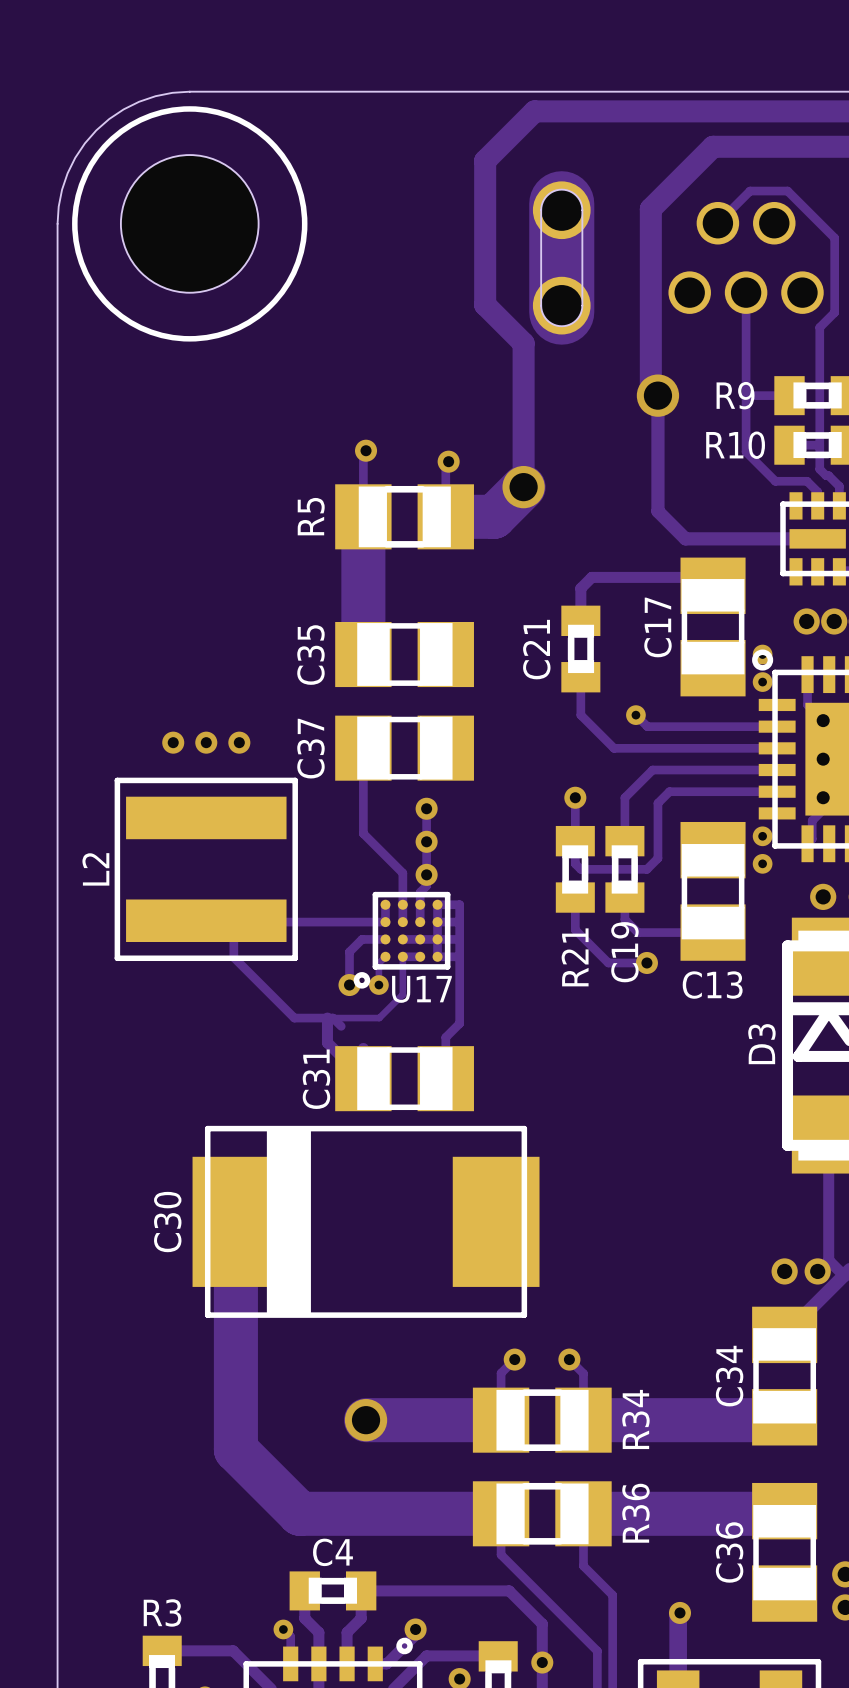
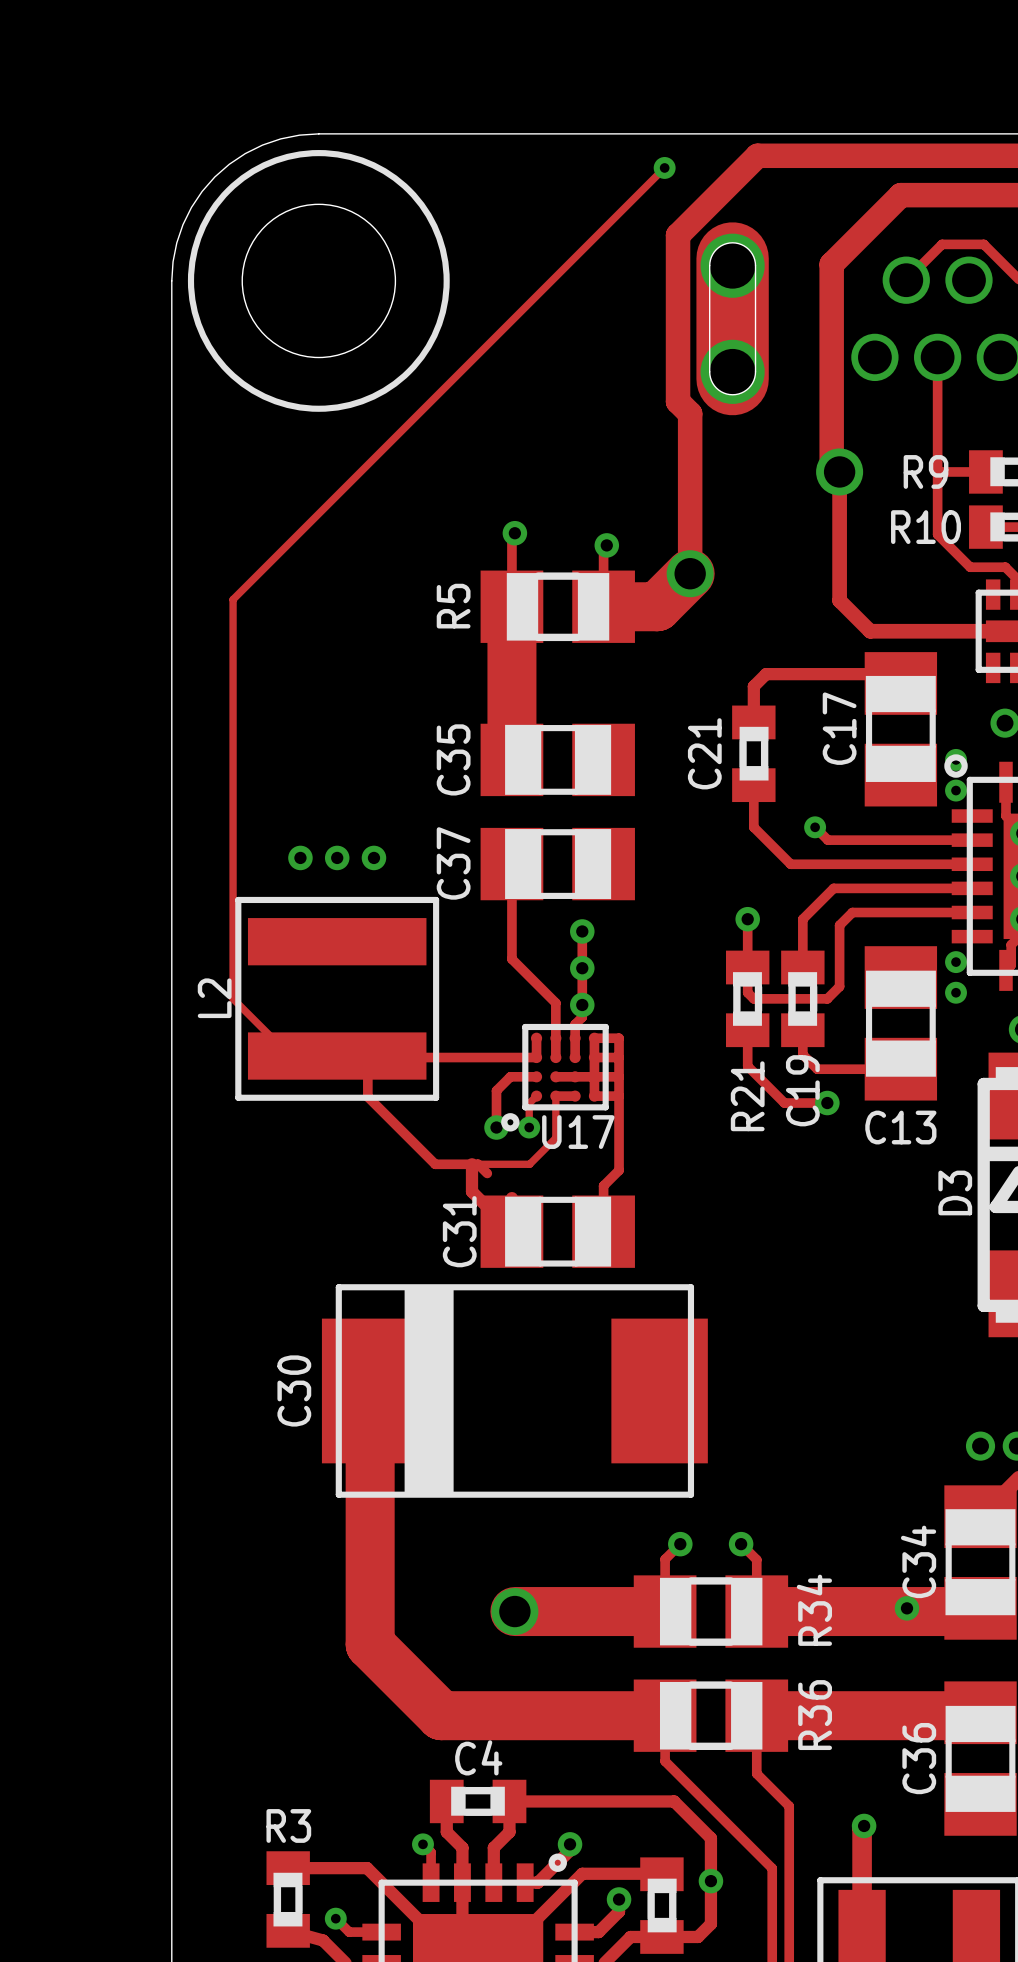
track: (584, 111) (534, 111) (485, 160) (485, 304) (512, 332) -> (757, 155) (678, 235) (678, 401)
track: none -> (664, 167) (233, 599) (233, 998) (290, 1056)
via: none -> (664, 167)
via: none -> (907, 1608)

